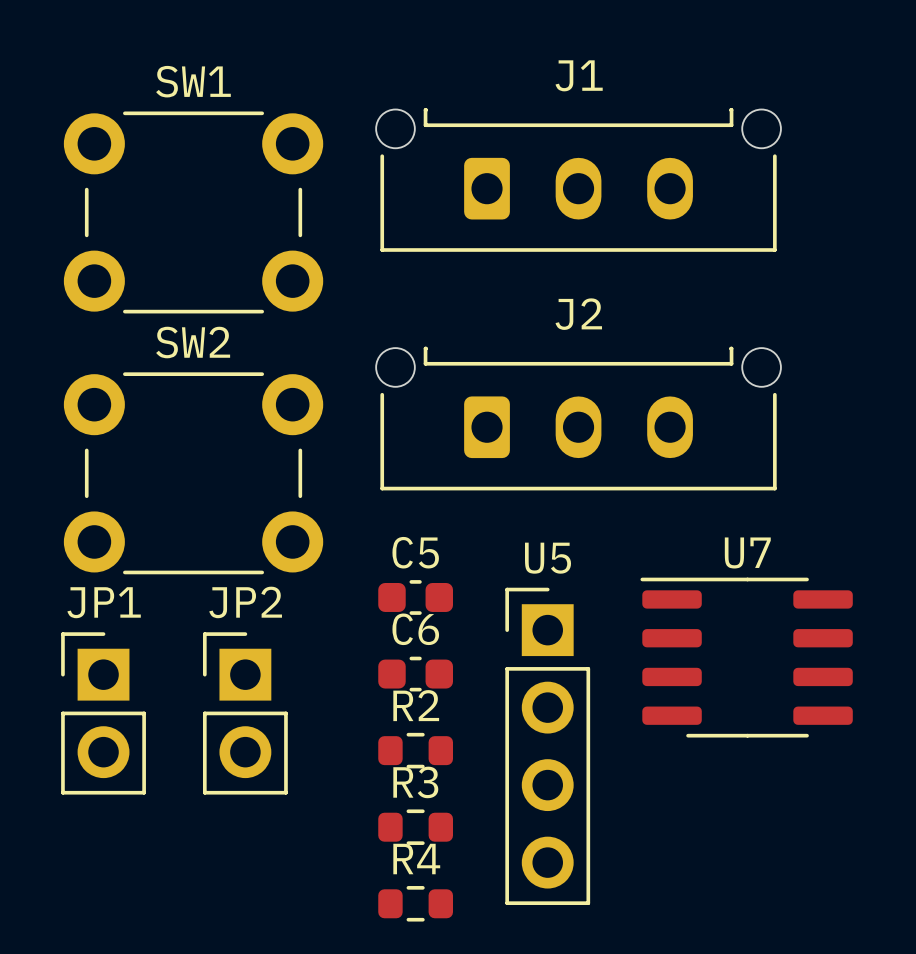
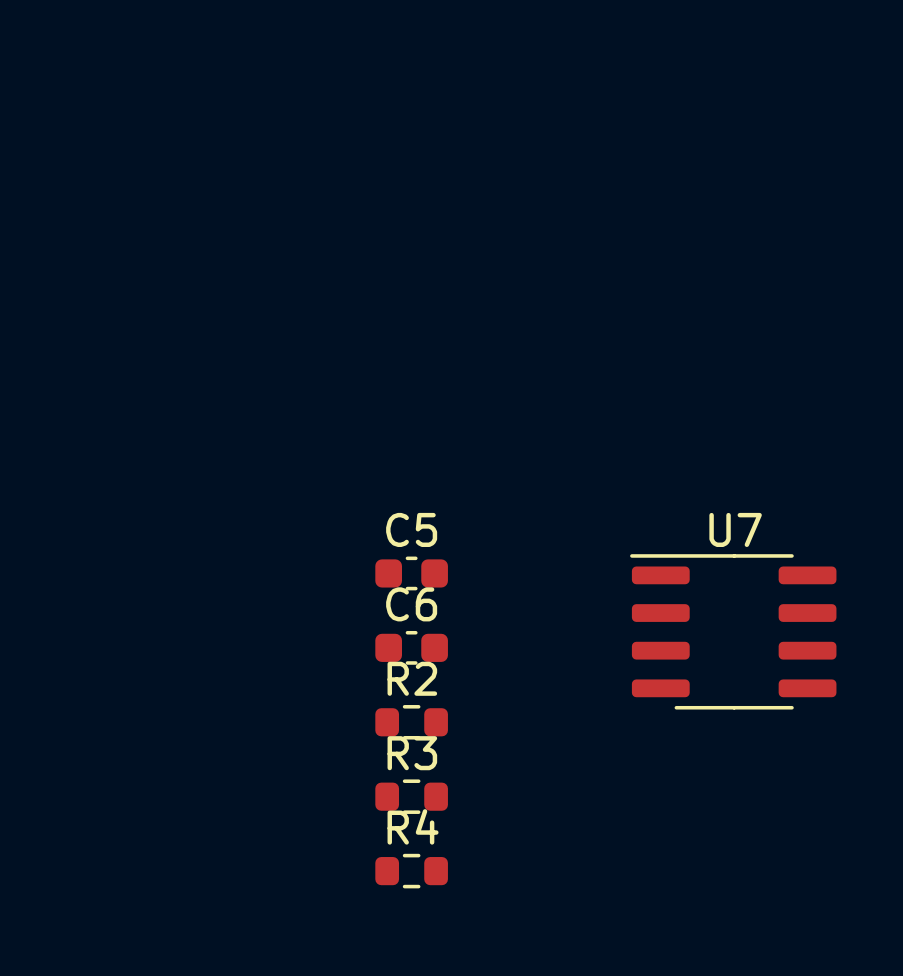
J1: (578, 179) -> none
SW1: (193, 212) -> none
J2: (578, 418) -> none
SW2: (193, 473) -> none
JP1: (103, 713) -> none
JP2: (245, 713) -> none
U5: (547, 746) -> none

